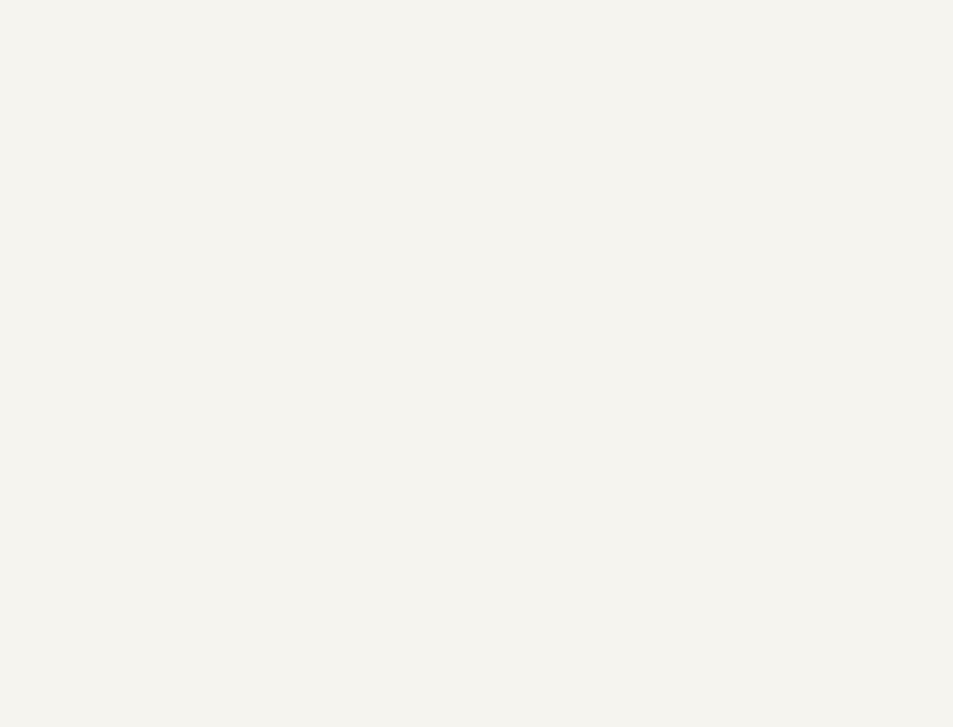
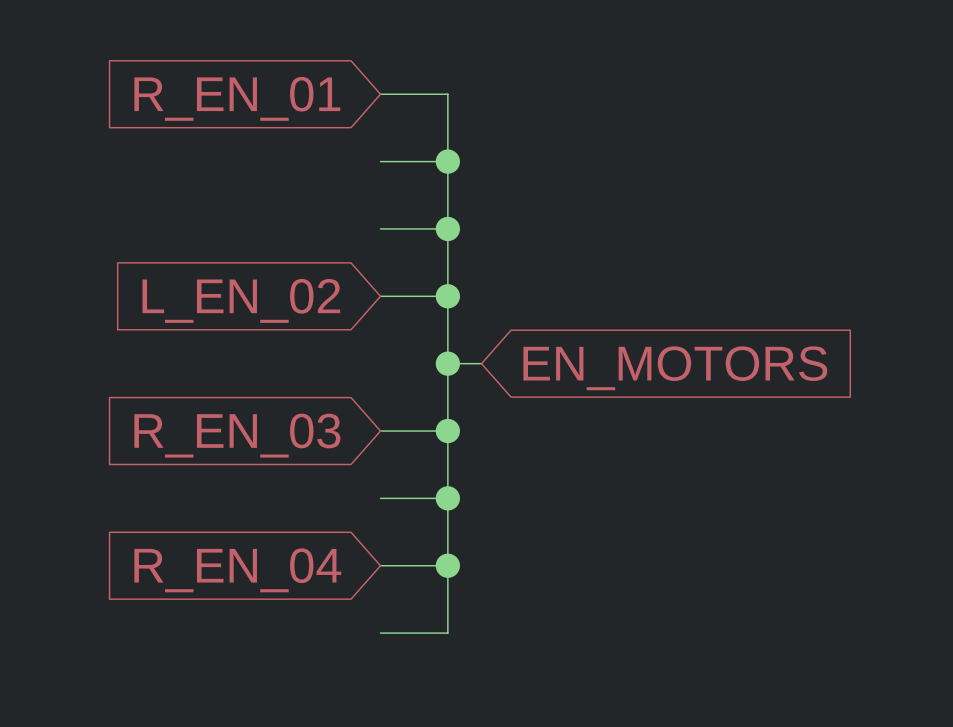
wire: none -> (380, 94) (447, 94) (447, 633) (380, 633)
global label: none -> R_EN_01 (237, 98)
wire: none -> (380, 161) (447, 161)
junction: none -> (447, 161)
wire: none -> (380, 228) (447, 228)
junction: none -> (447, 228)
wire: none -> (380, 296) (447, 296)
junction: none -> (447, 296)
global label: none -> L_EN_02 (241, 300)
wire: none -> (447, 363) (481, 363)
junction: none -> (447, 363)
global label: none -> EN_MOTORS (675, 368)
wire: none -> (380, 431) (447, 431)
junction: none -> (447, 431)
global label: none -> R_EN_03 (237, 435)
wire: none -> (380, 498) (447, 498)
junction: none -> (447, 498)
wire: none -> (380, 565) (447, 565)
junction: none -> (447, 565)
global label: none -> R_EN_04 (237, 570)

